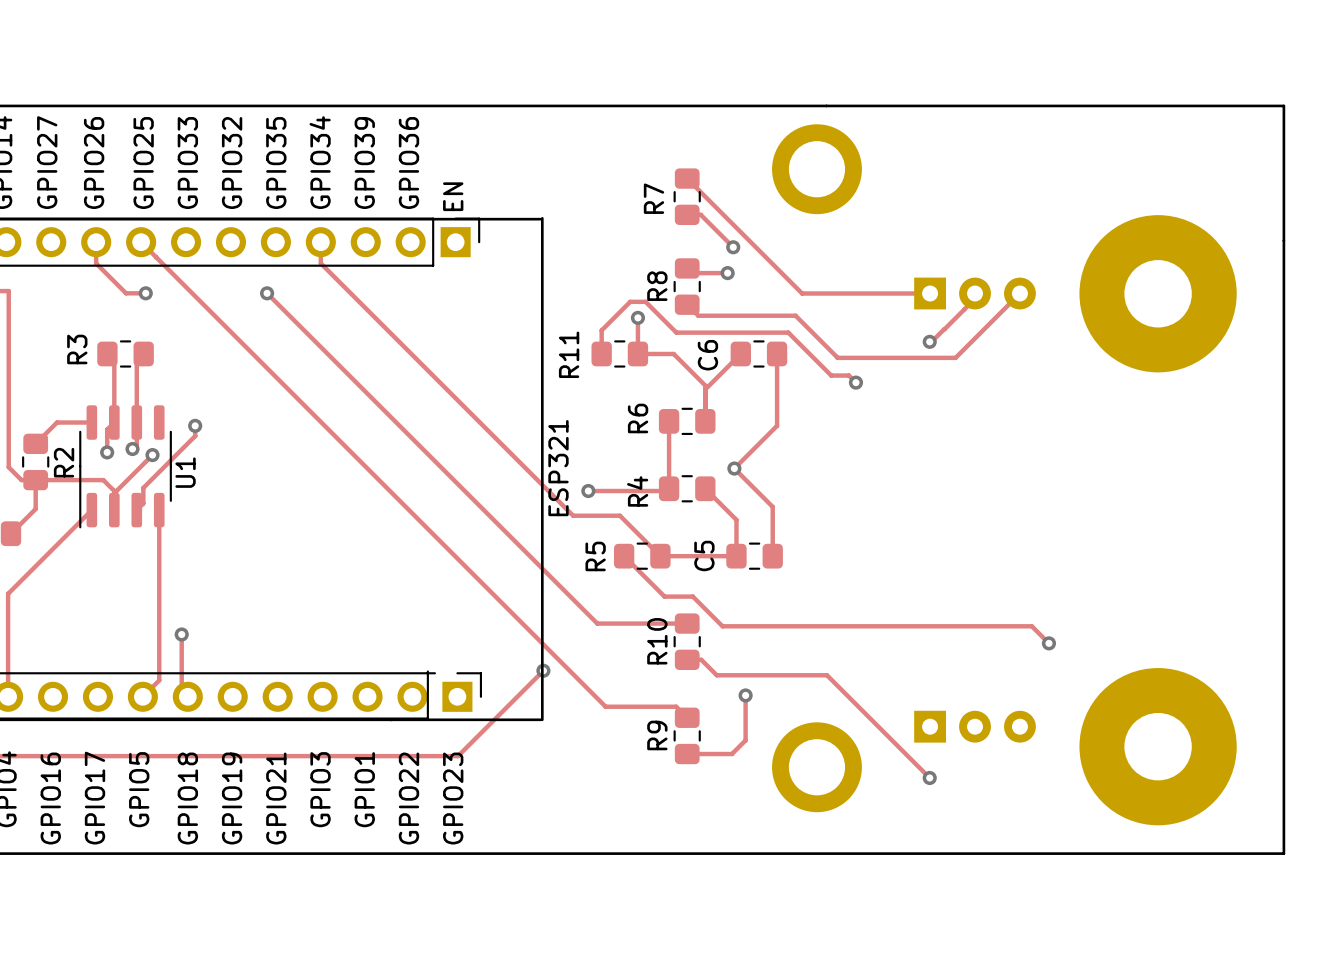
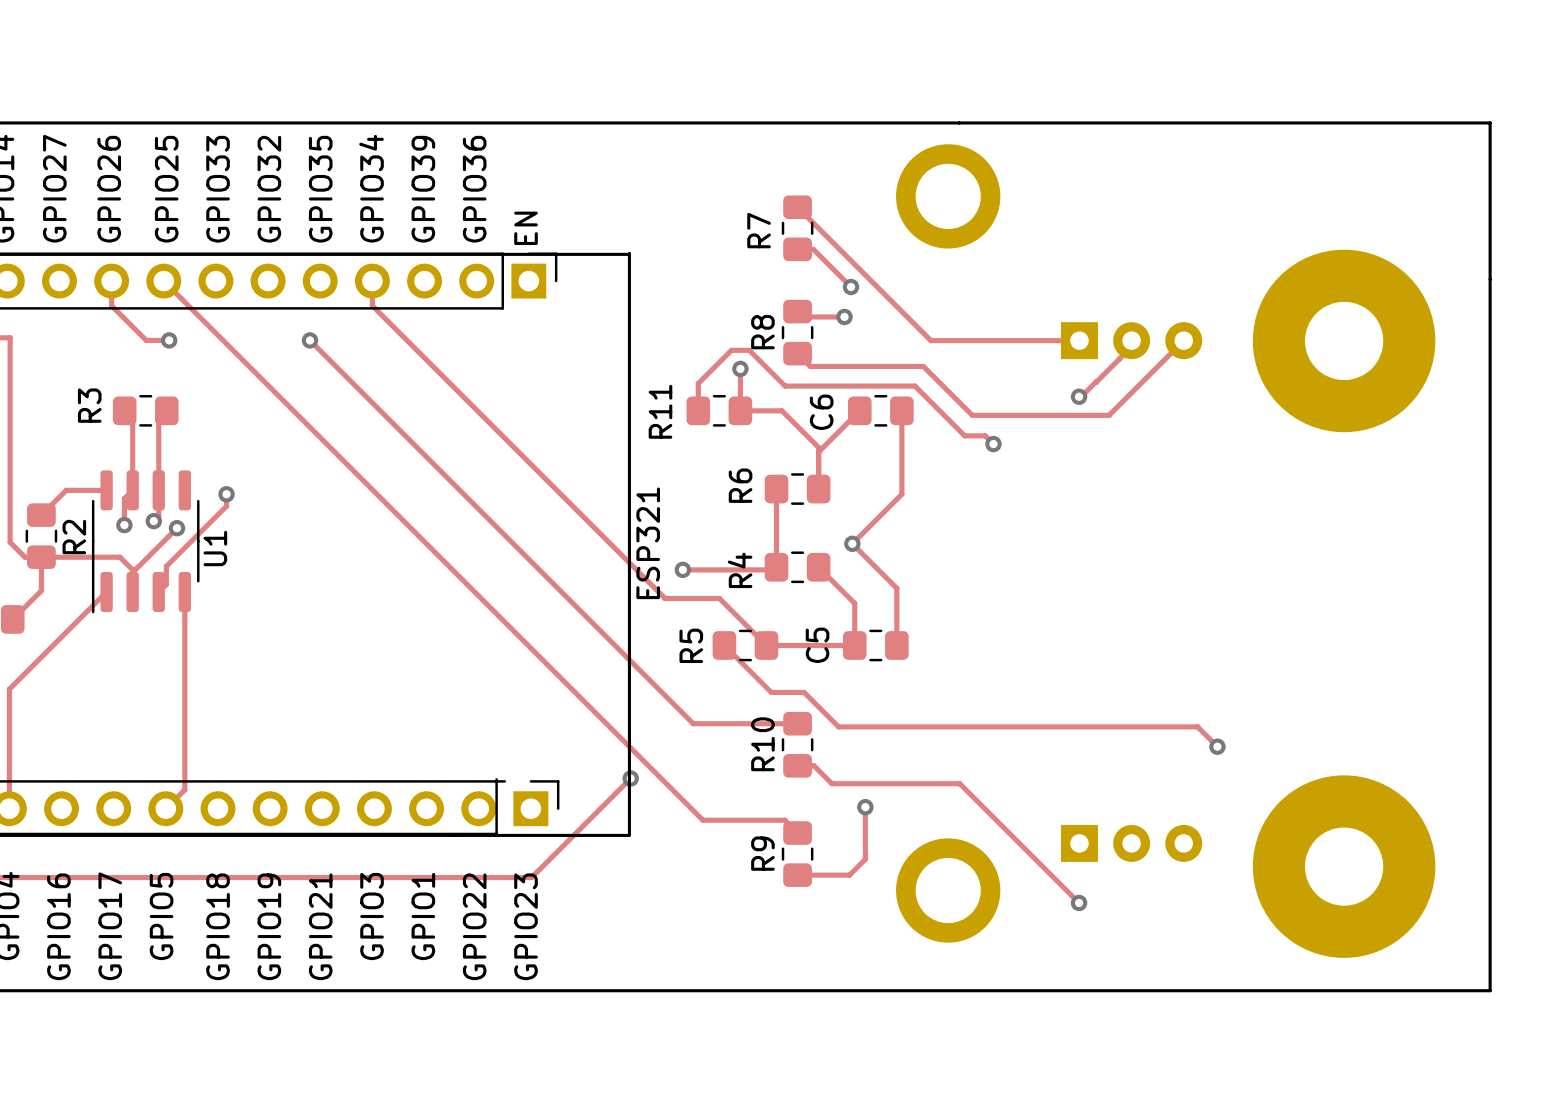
track: (181, 634) (181, 690) (187, 696) -> none
via: (181, 634) -> none

